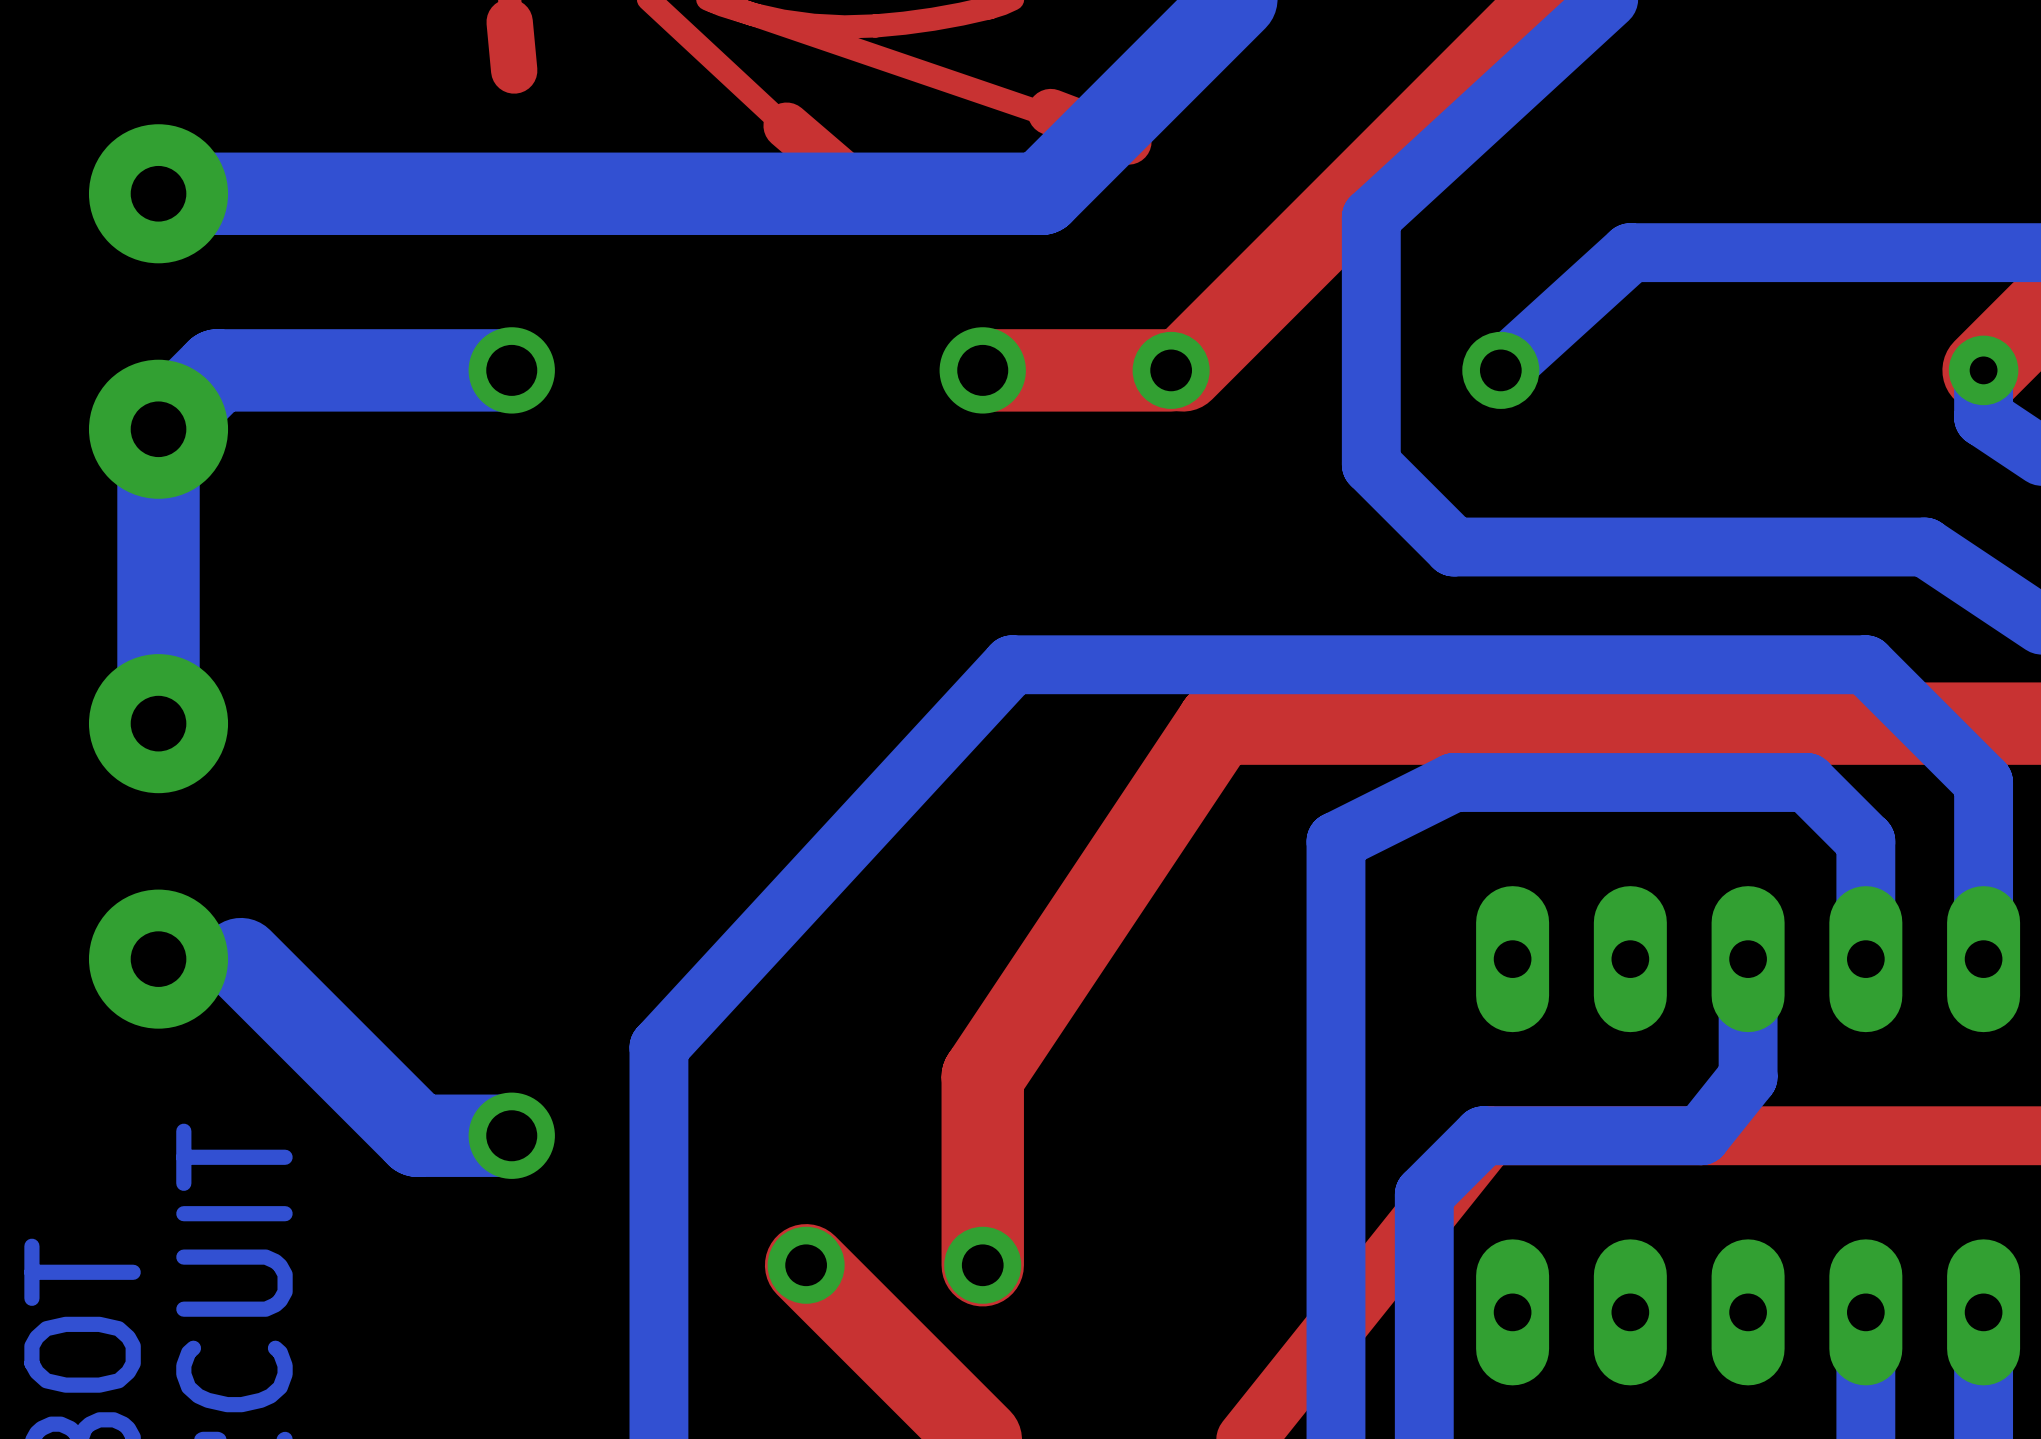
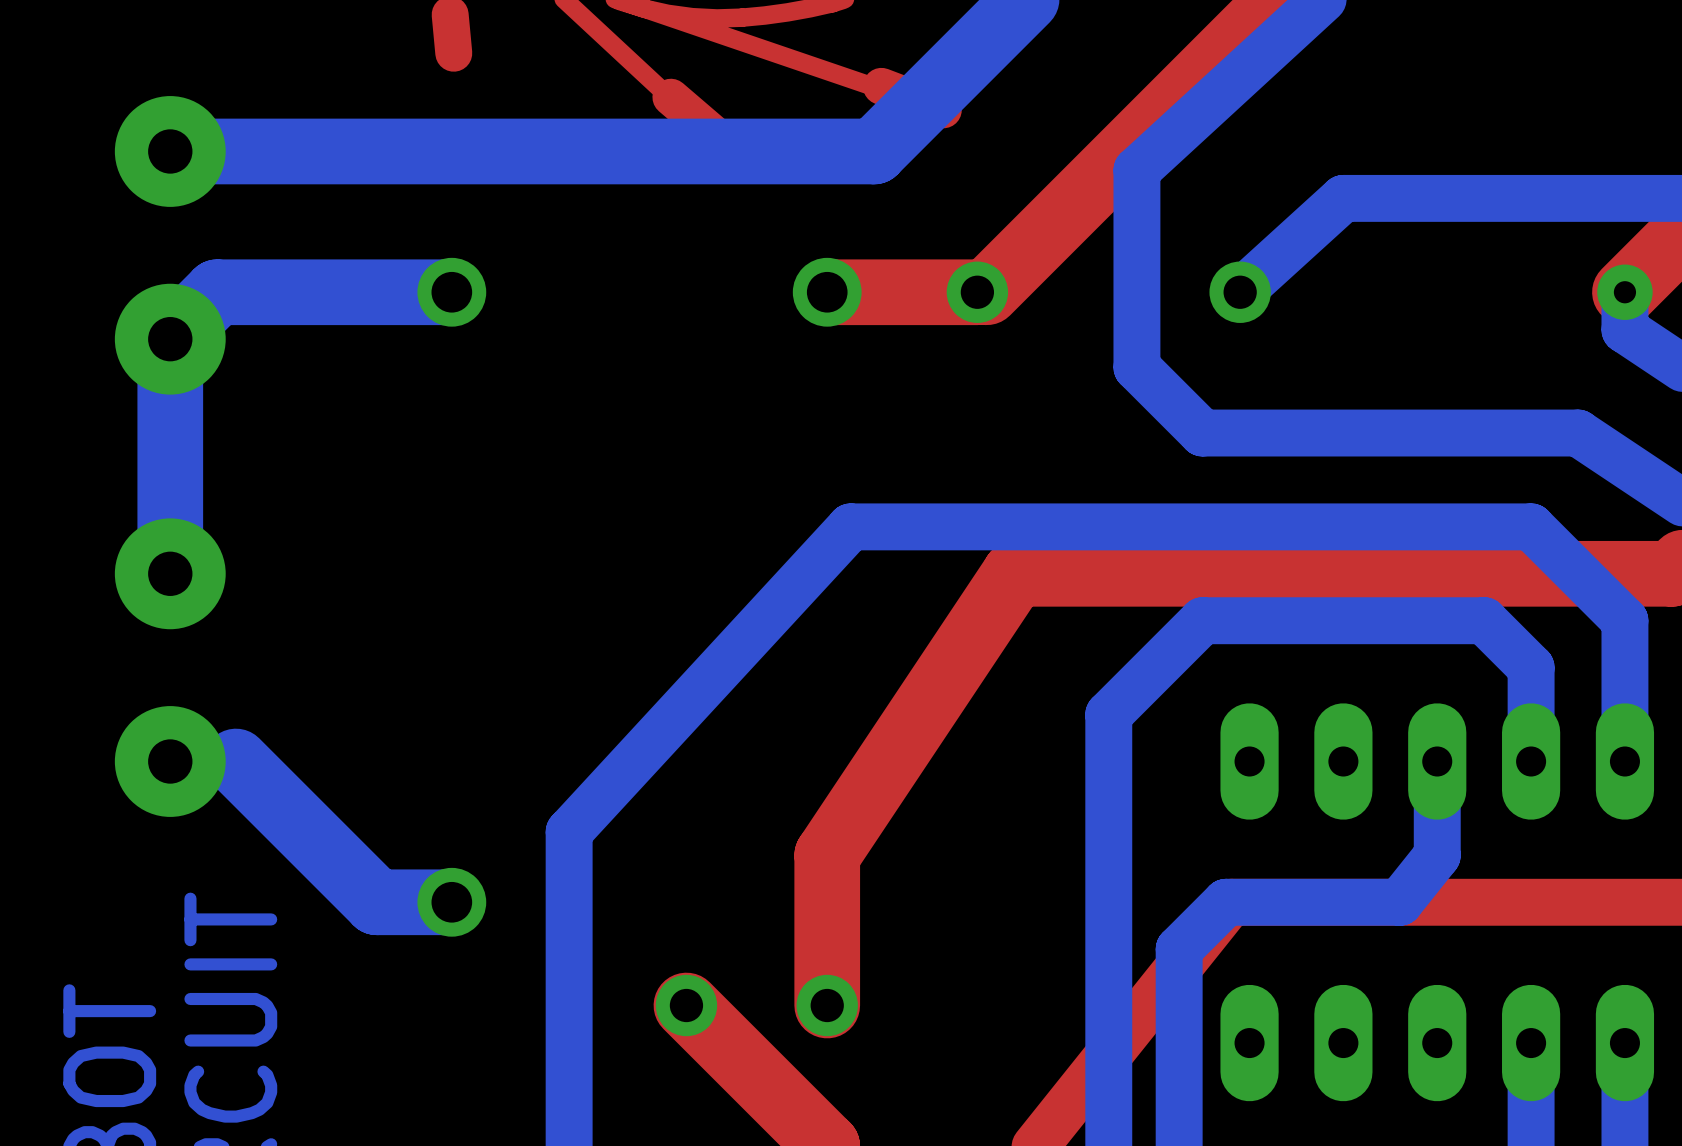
bottom track: (1453, 782) (1335, 841) (1335, 900) -> (1202, 620) (1108, 714)

